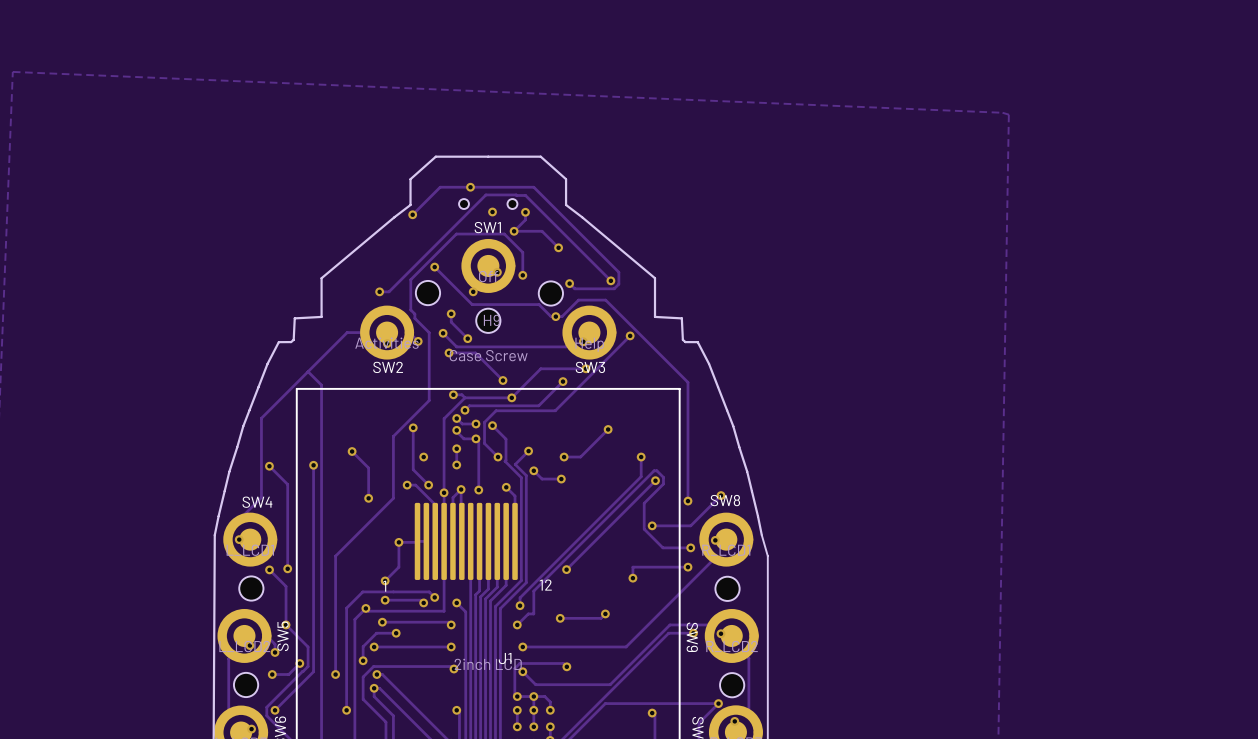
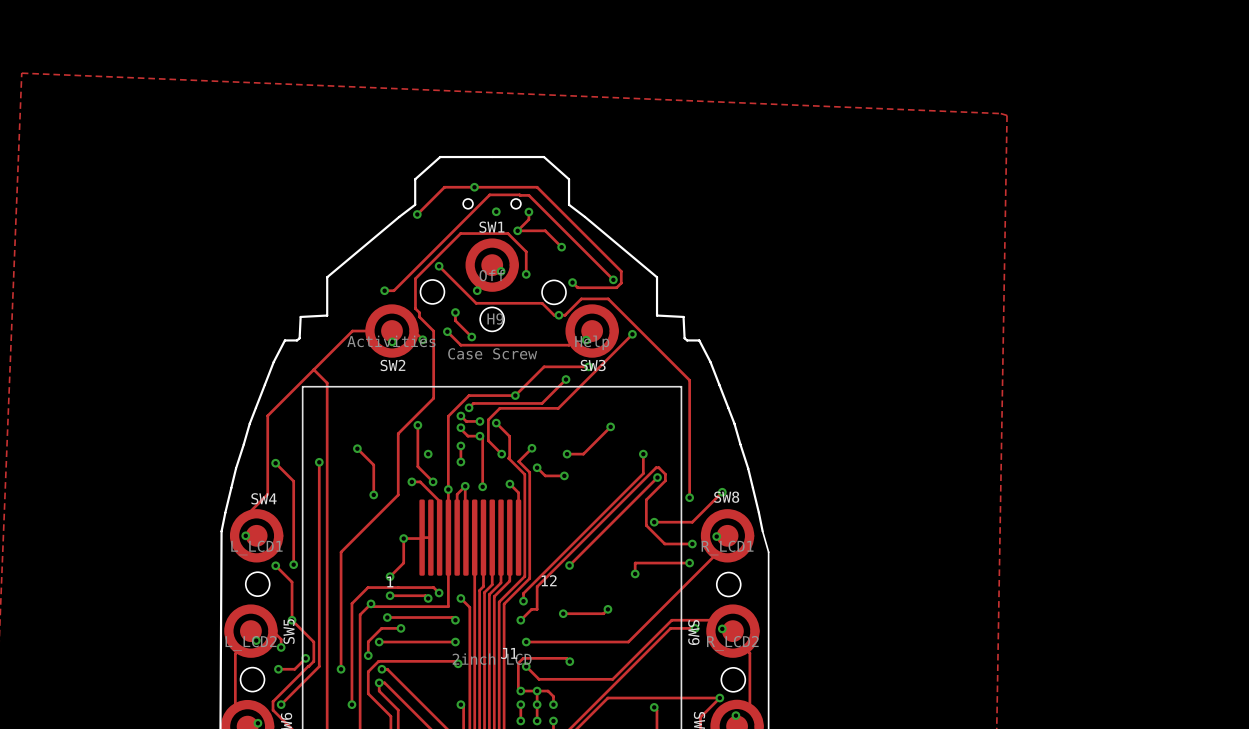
track: (449, 352) (475, 352) (502, 380) -> none
via: (449, 352) -> none
via: (502, 380) -> none
track: (453, 394) (461, 394) (464, 397) -> none
via: (453, 394) -> none

